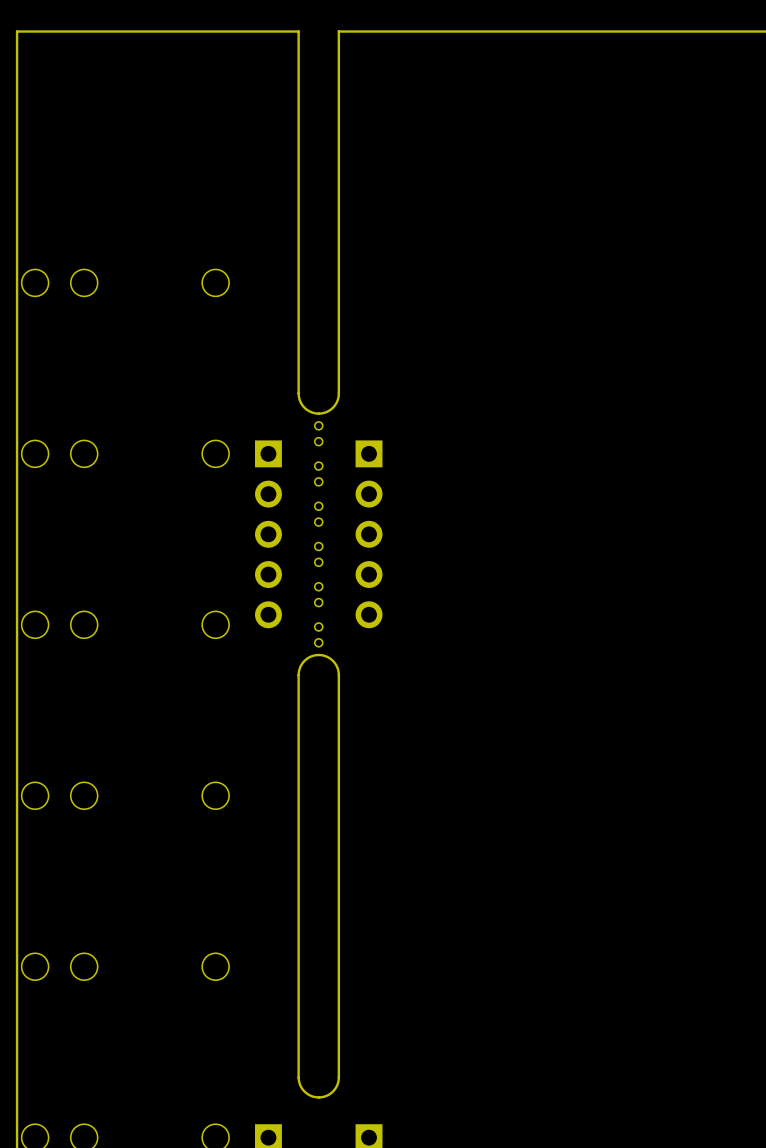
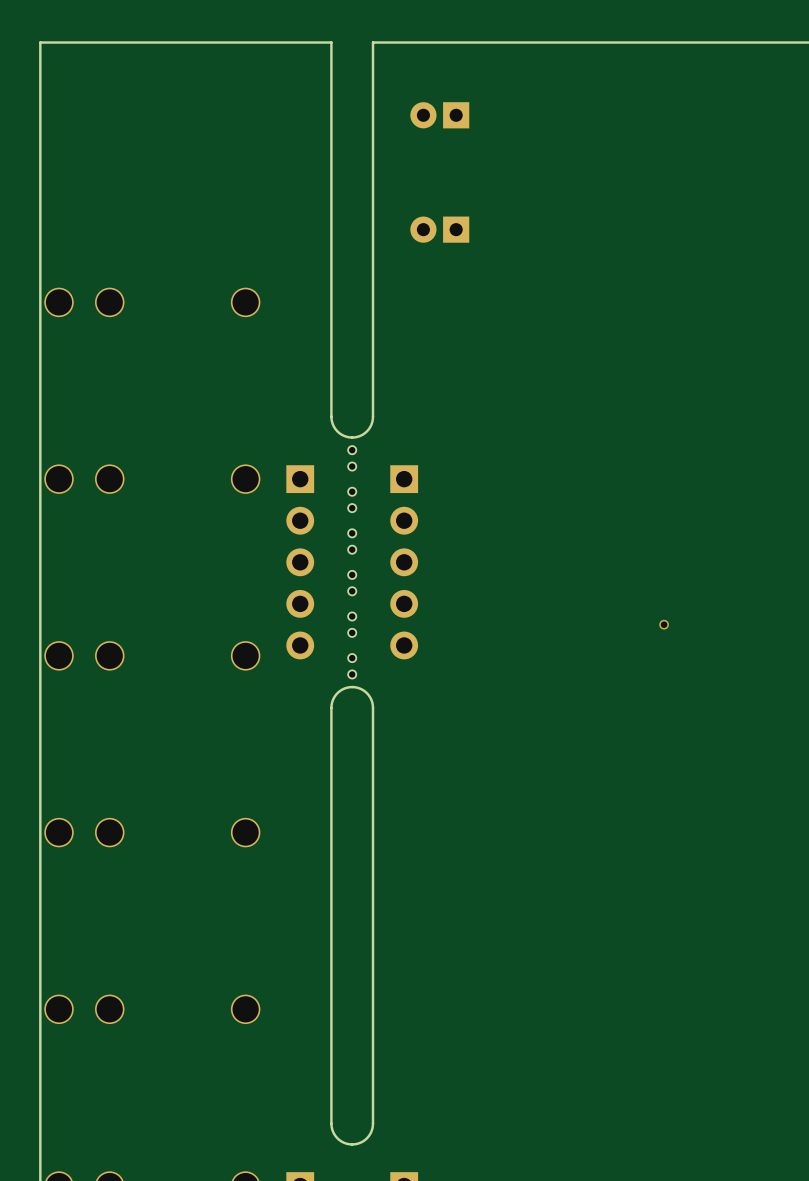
part: none -> (439, 115)
part: none -> (439, 229)
via: none -> (664, 624)

